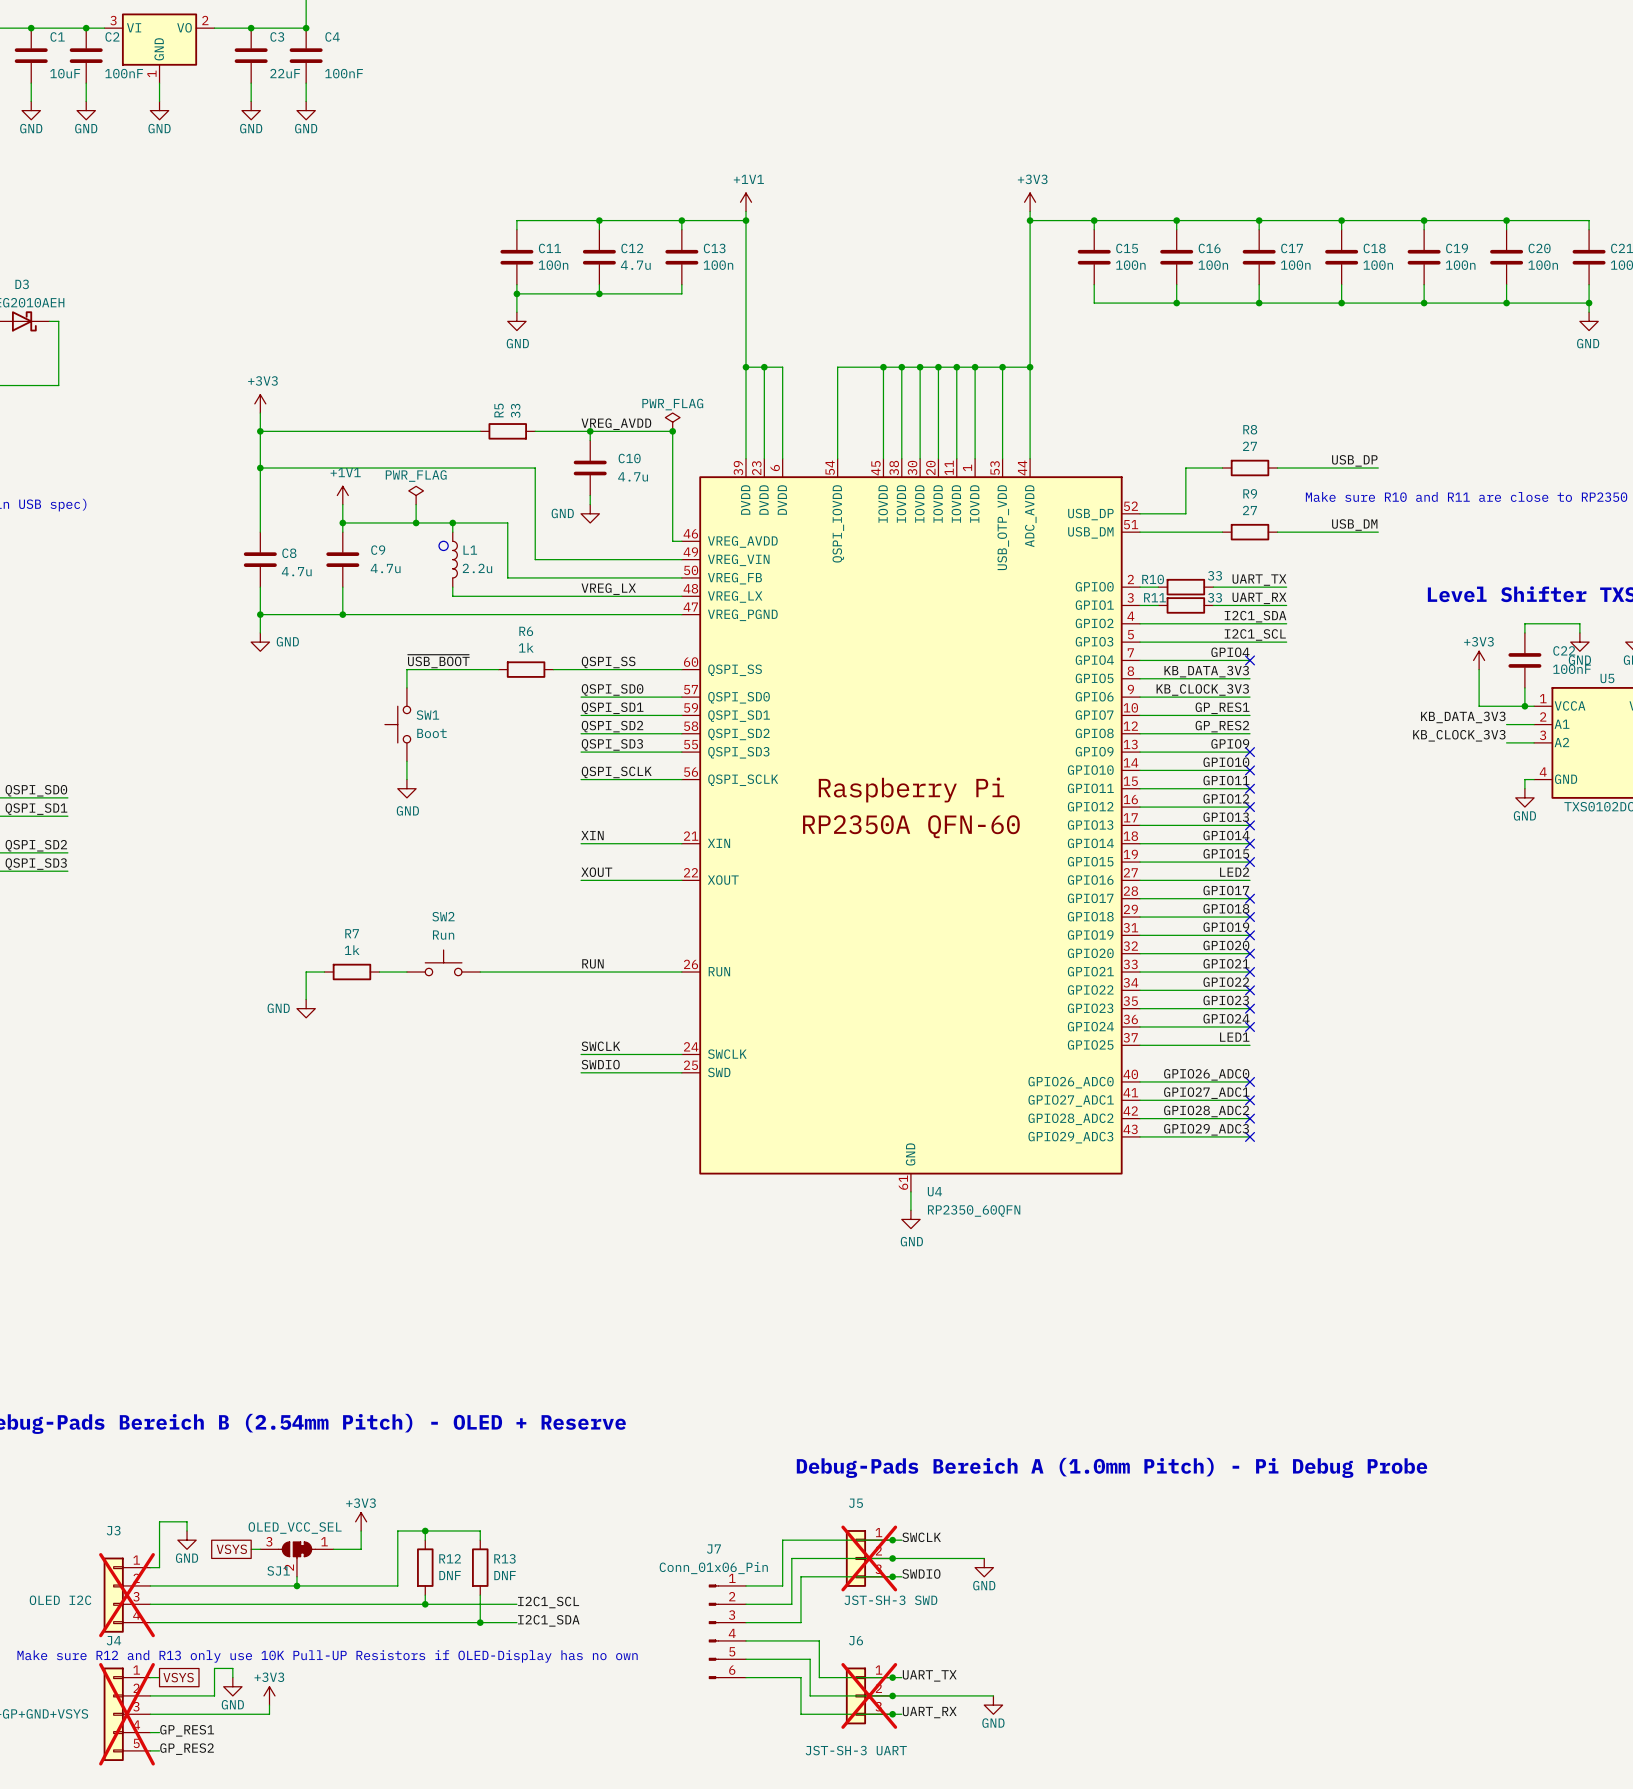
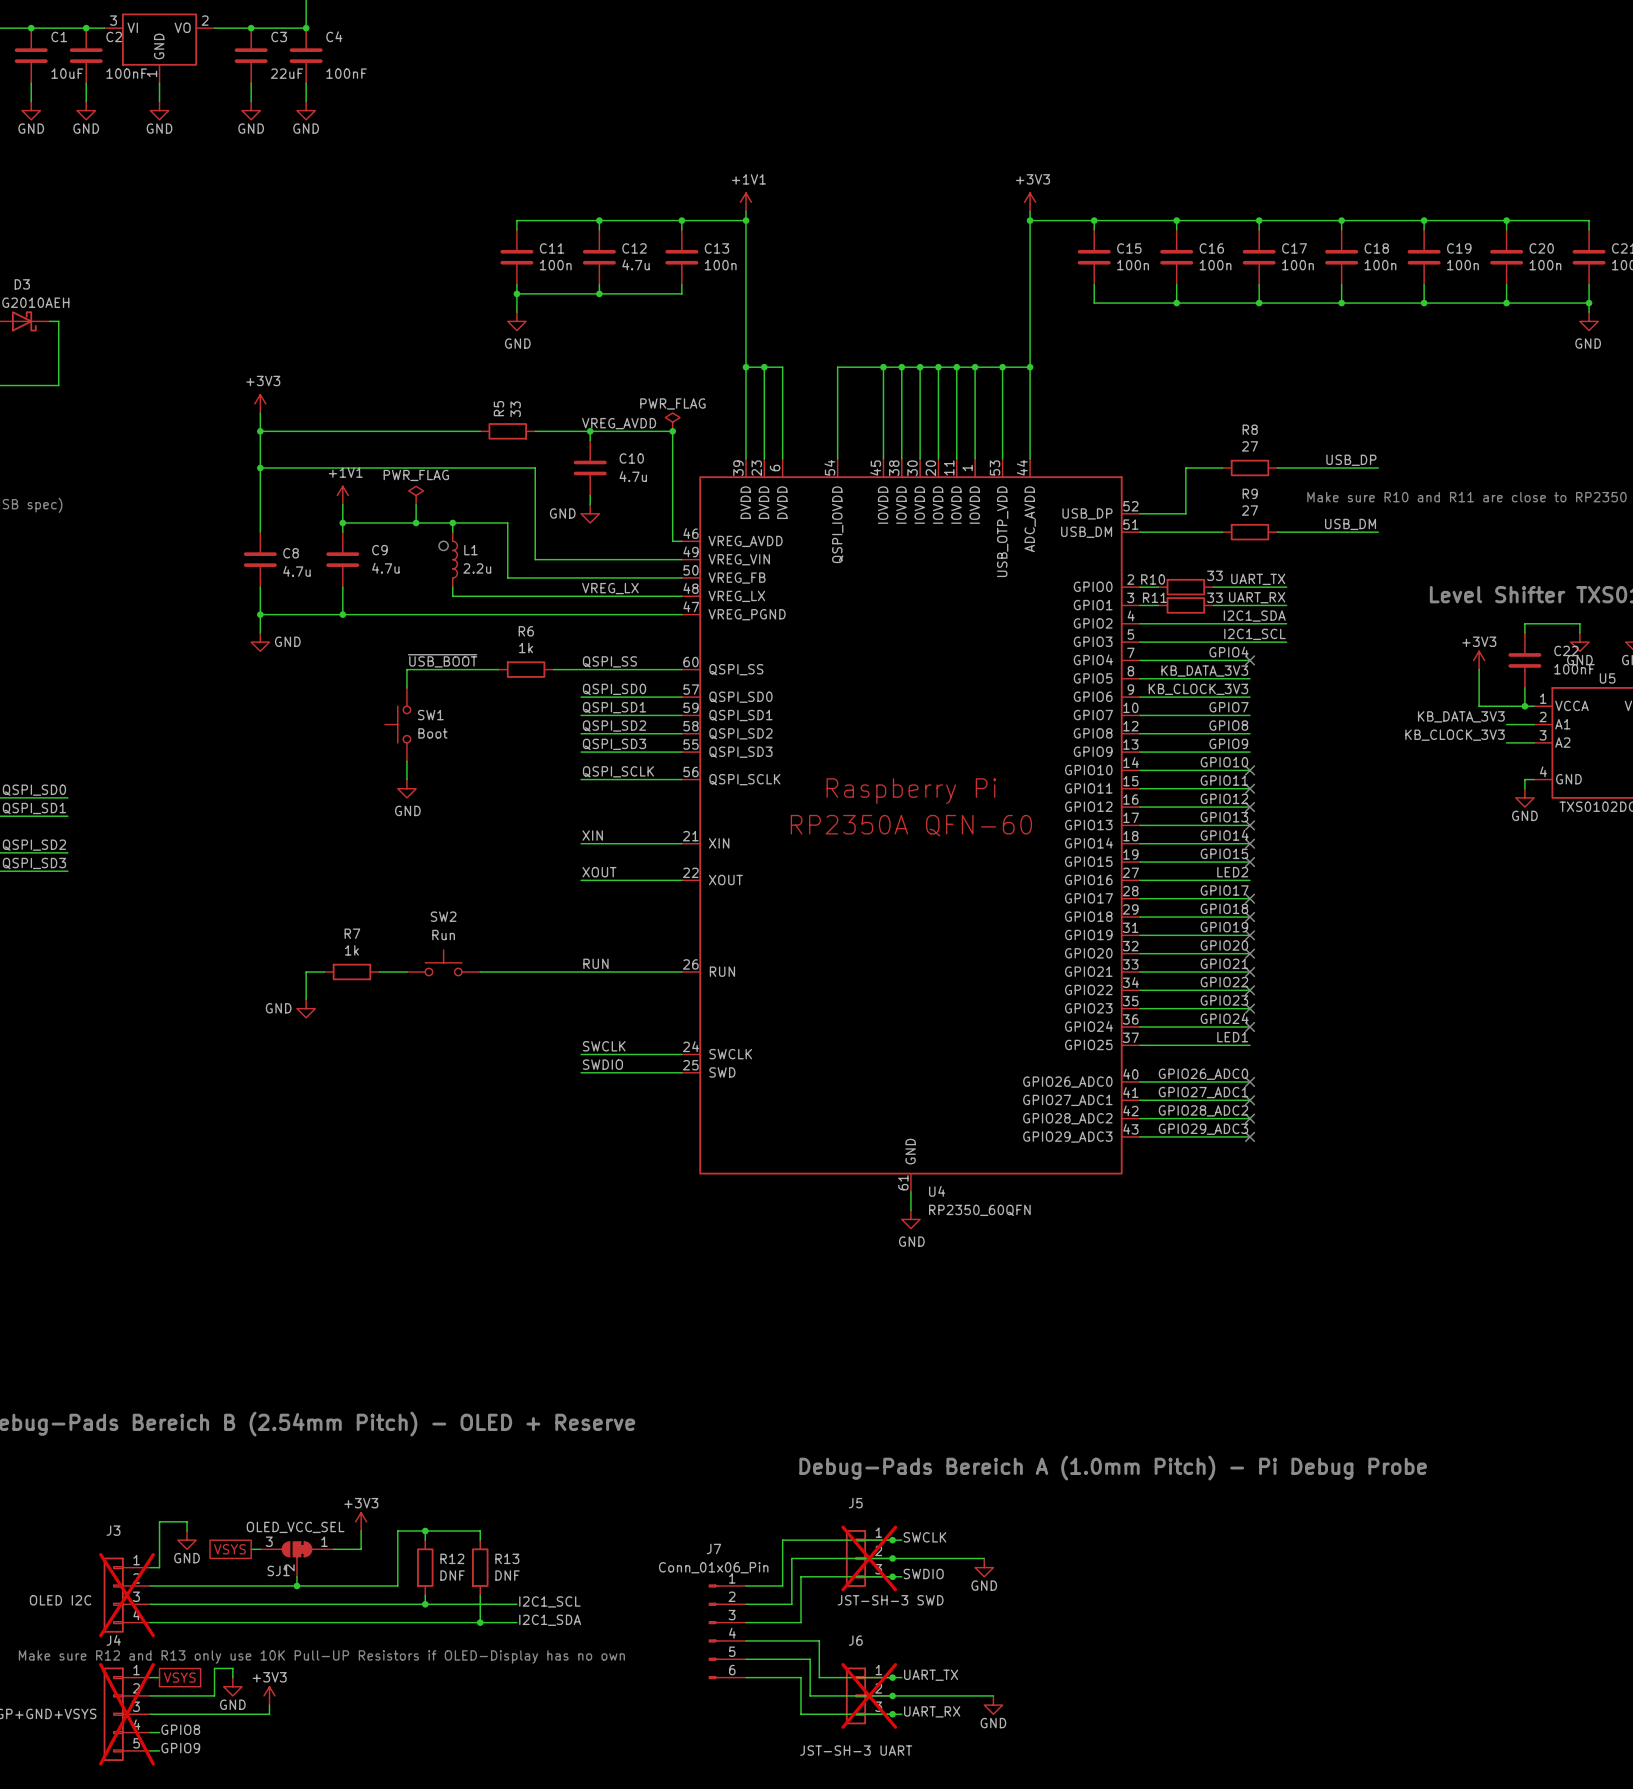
label: GP_RES1 (1222, 708) -> GPIO7 (1228, 707)
label: GP_RES2 (1222, 726) -> GPIO8 (1228, 725)
no-connect mark: (1250, 752) -> none
label: GP_RES1 (187, 1730) -> GPIO8 (180, 1729)
label: GP_RES2 (187, 1749) -> GPIO9 (180, 1748)

